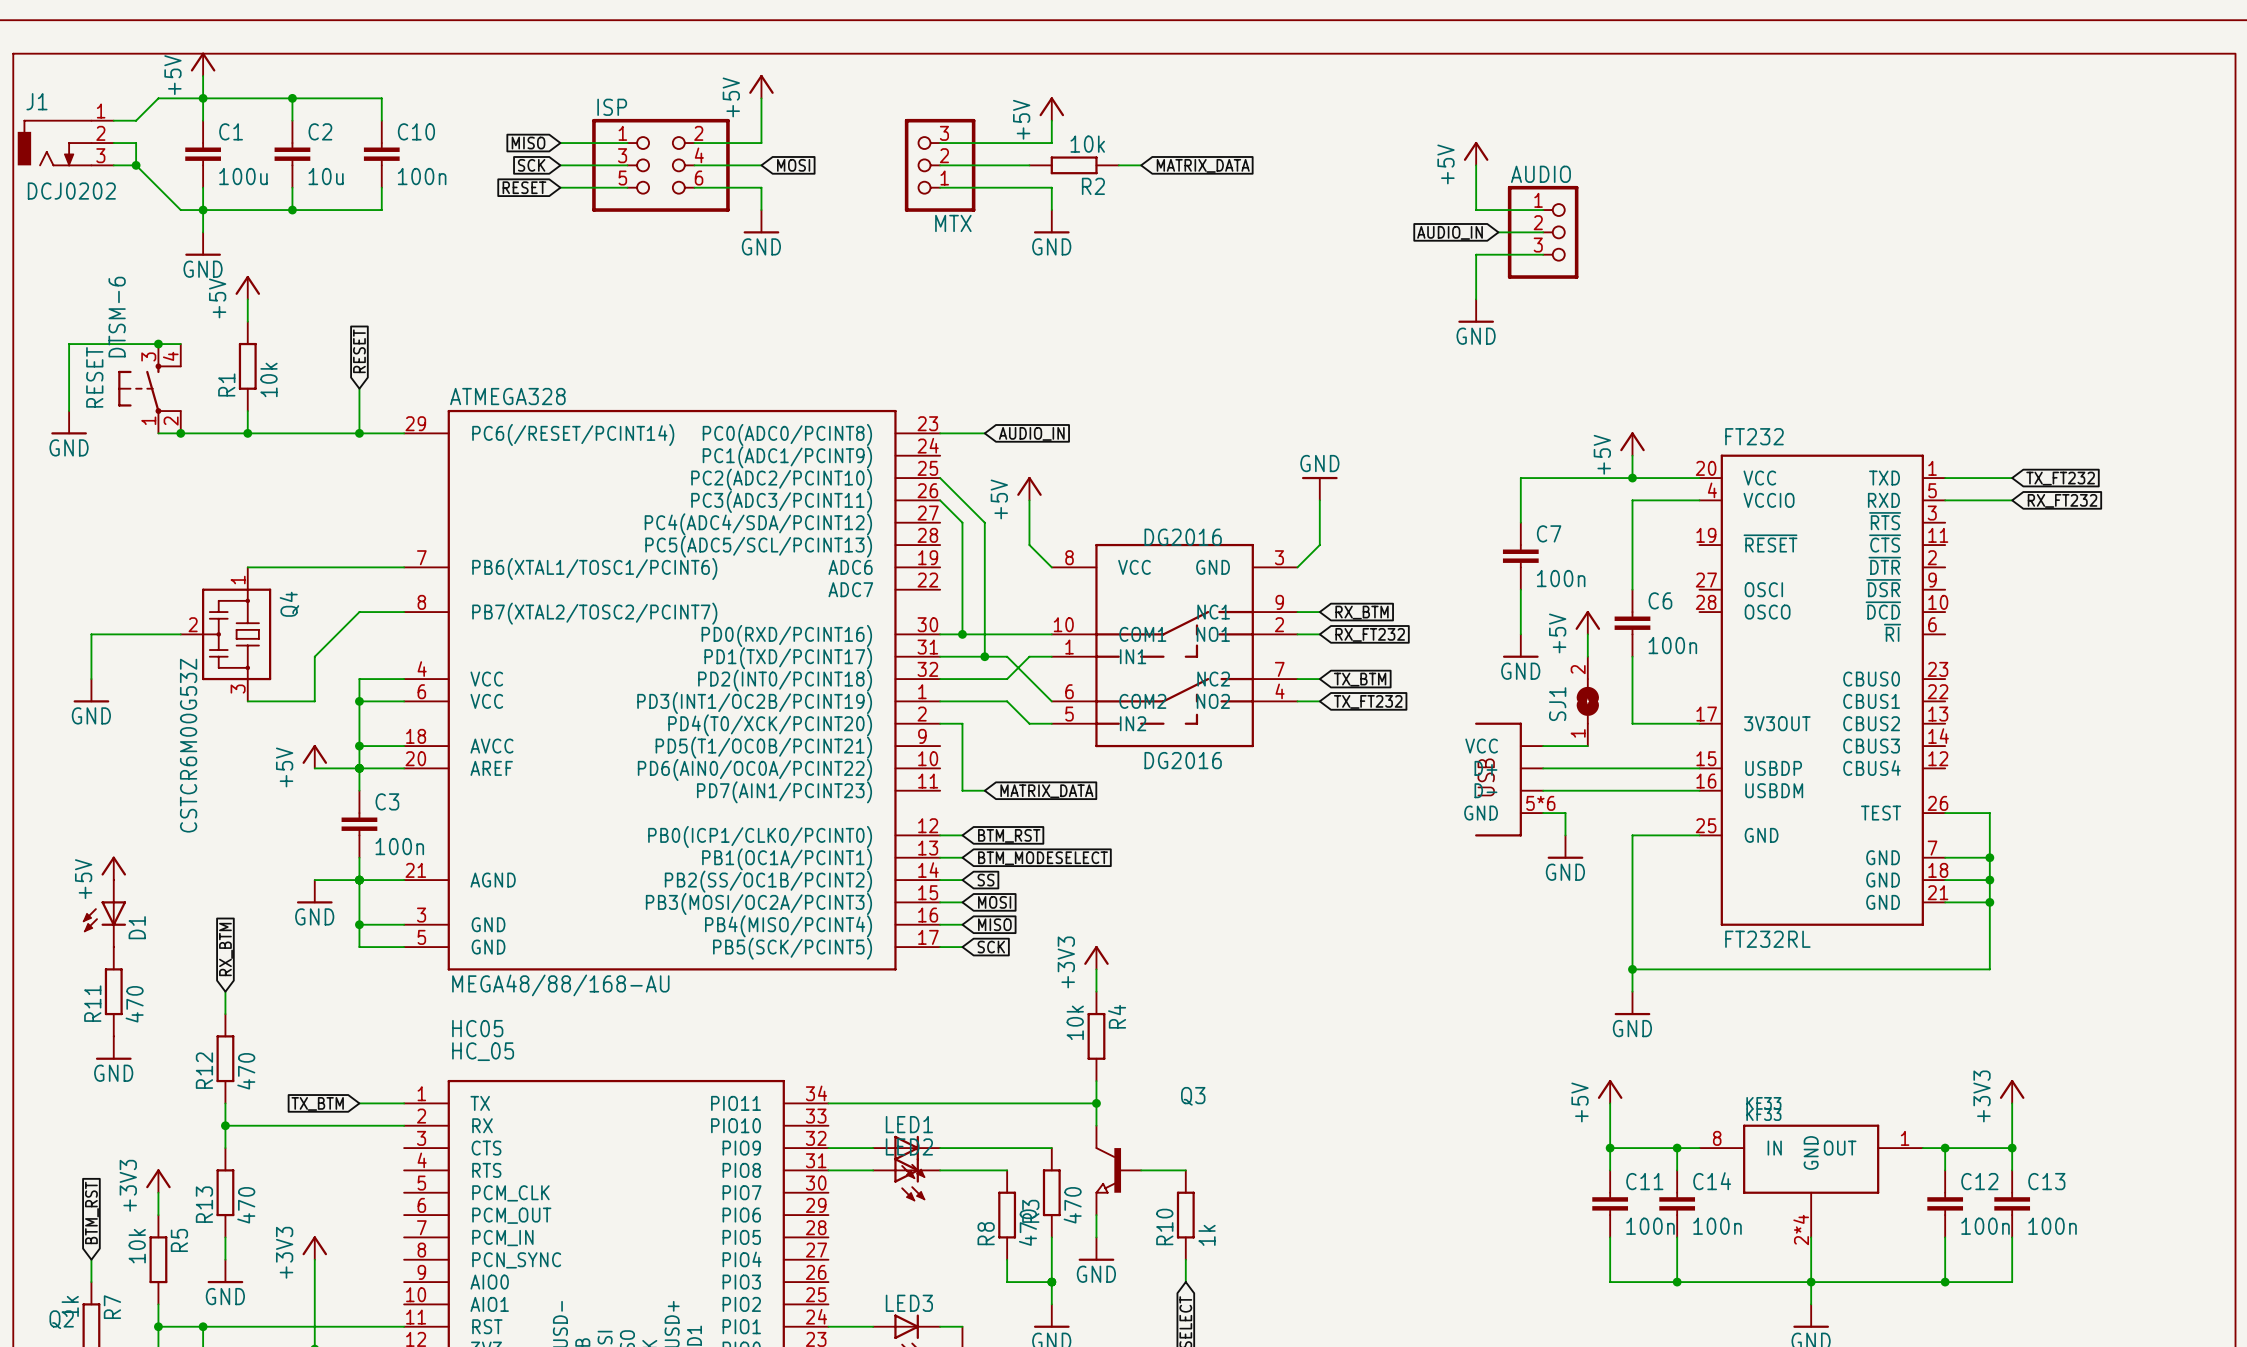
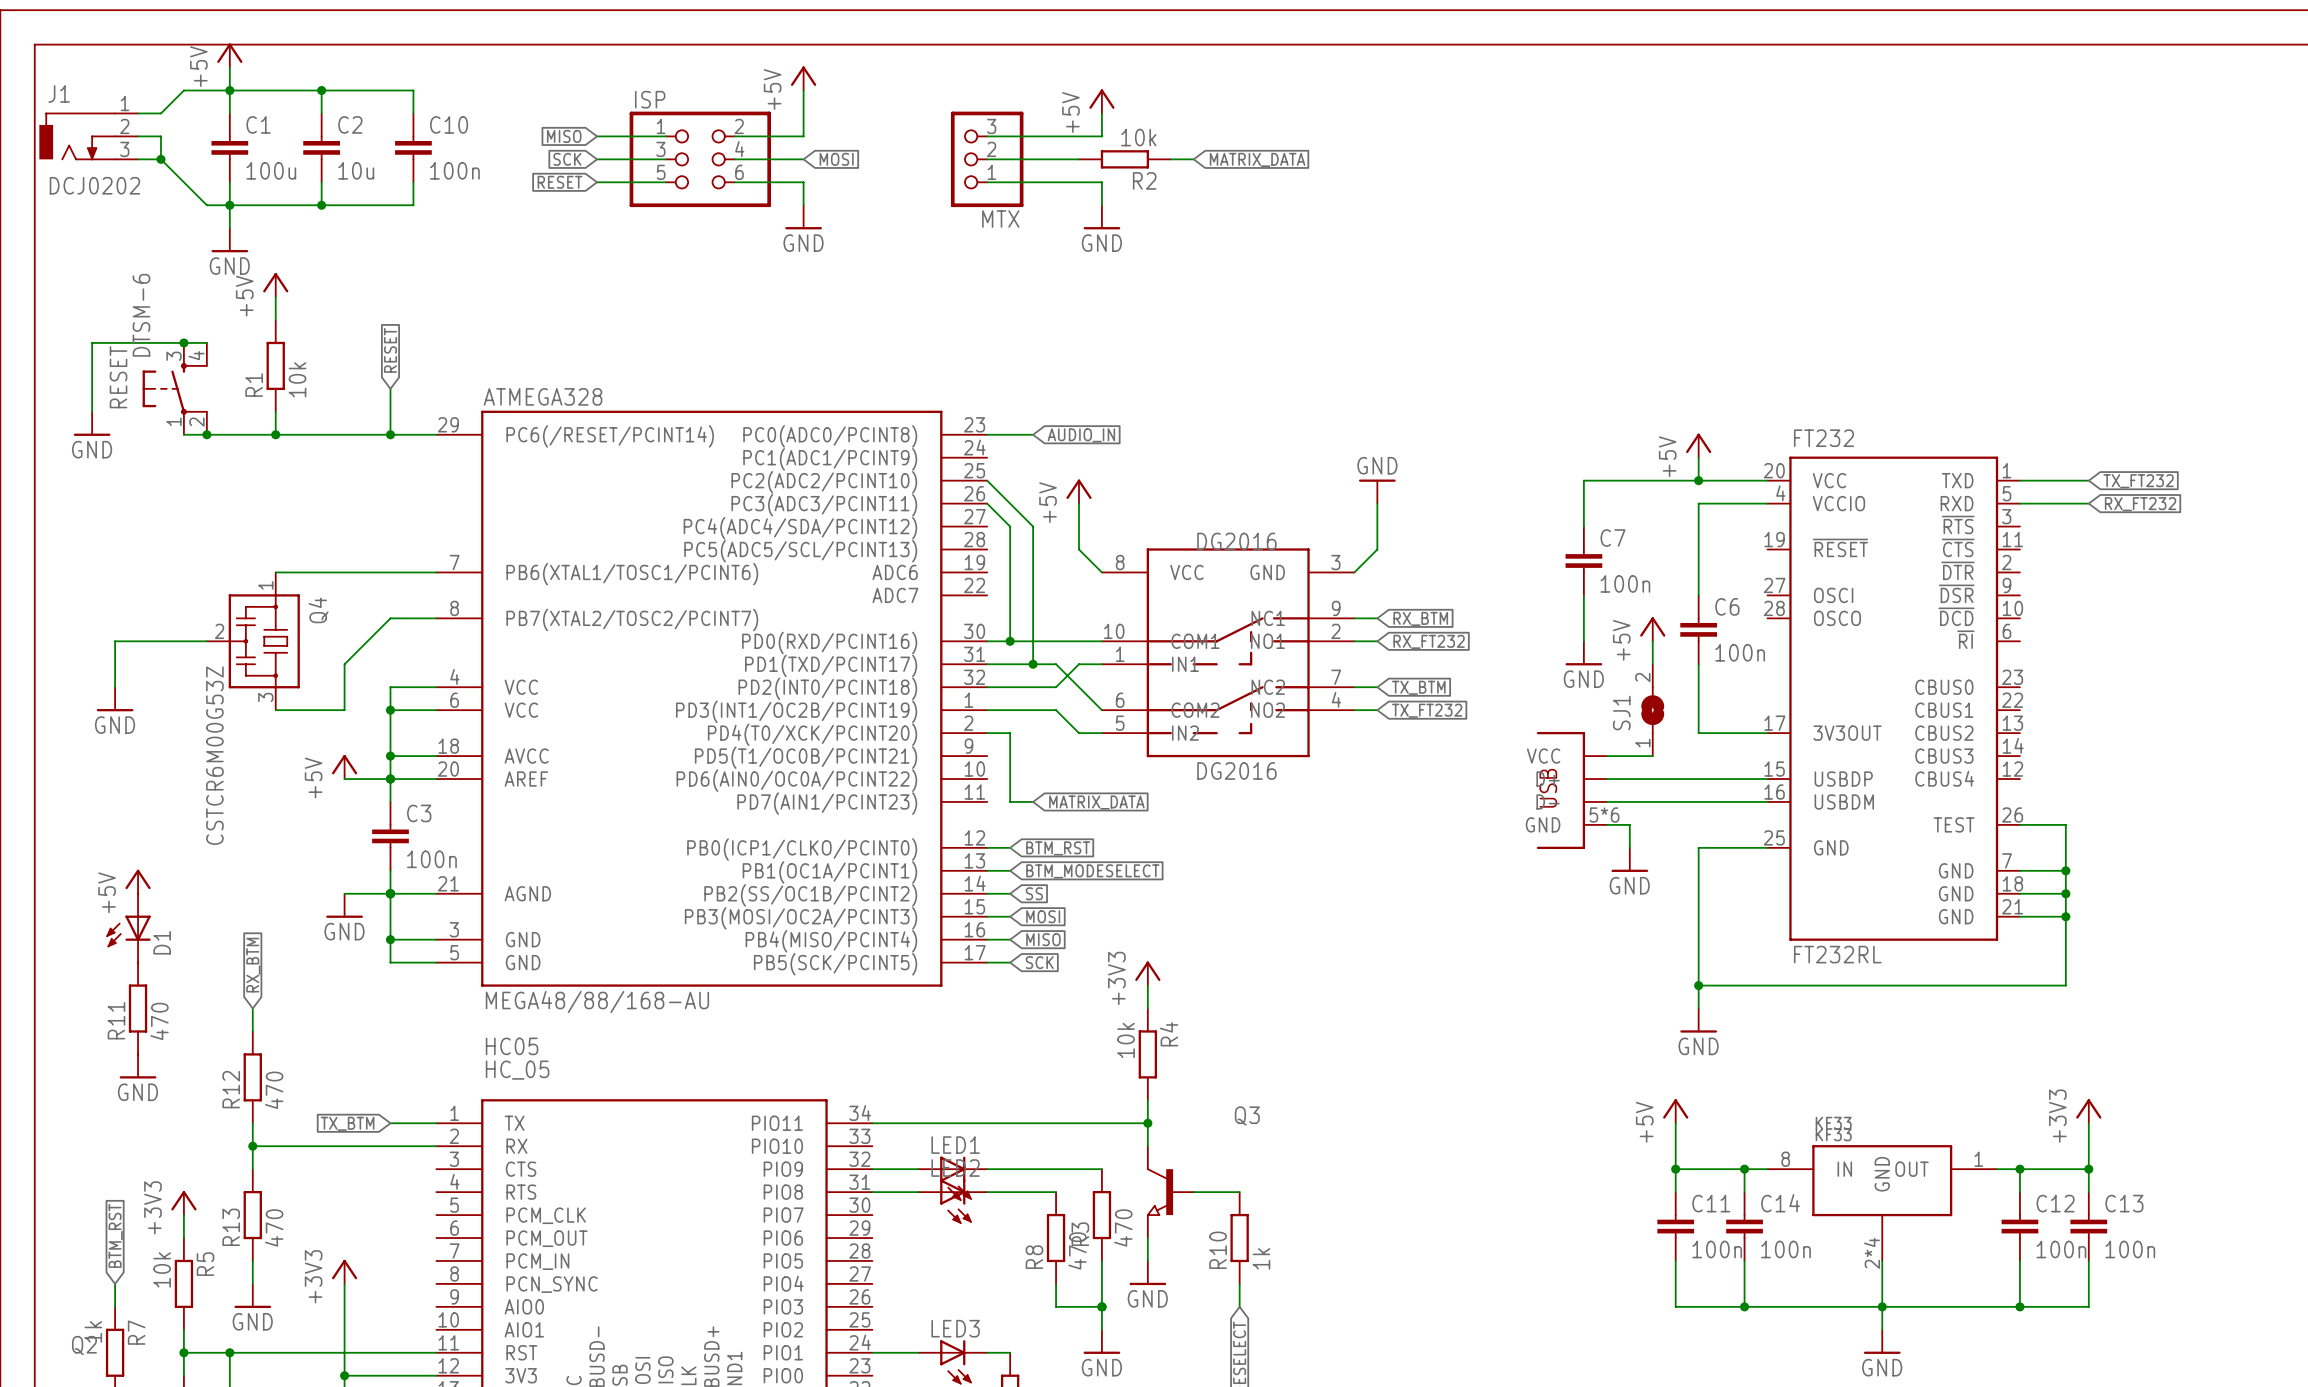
power symbol: +5V (1476, 153) -> none
wire: (1476, 165) (1476, 210) (1543, 210) -> none
global label: AUDIO_IN (1450, 232) -> none
wire: (1498, 232) (1543, 232) -> none
AUDIO: (1543, 232) -> none
wire: (1543, 254) (1476, 254) (1476, 299) -> none
power symbol: GND (1476, 311) -> none

